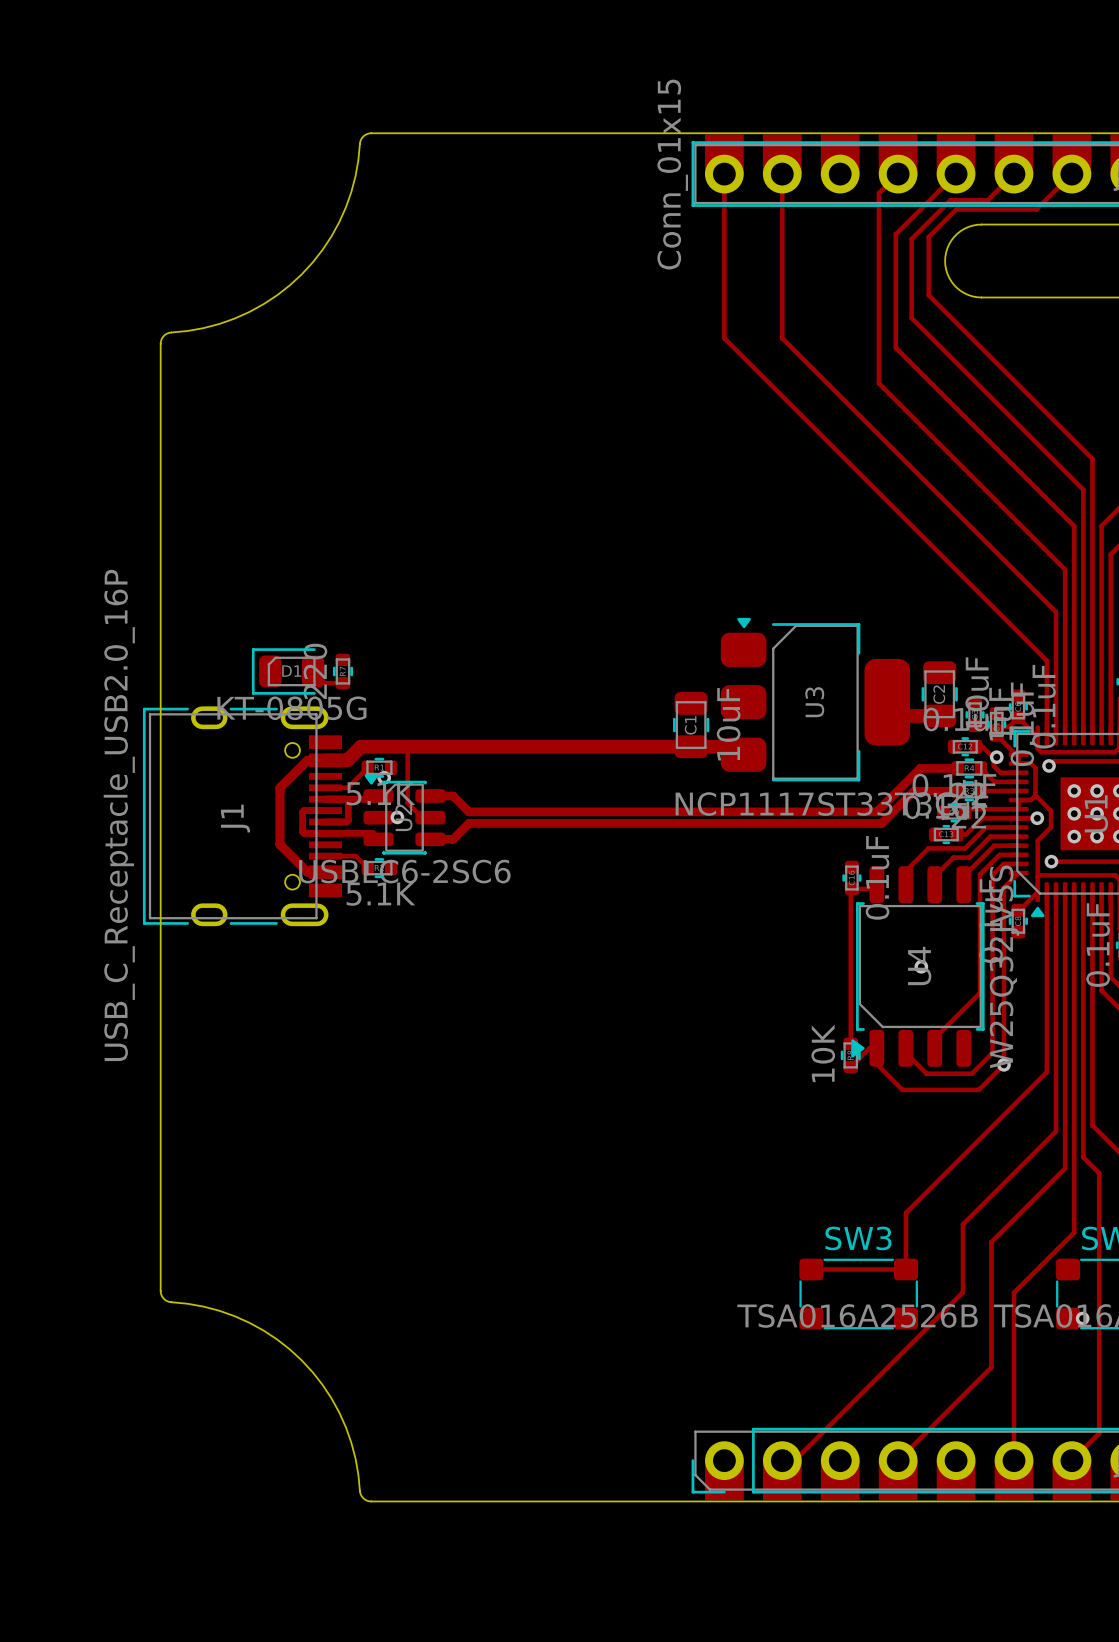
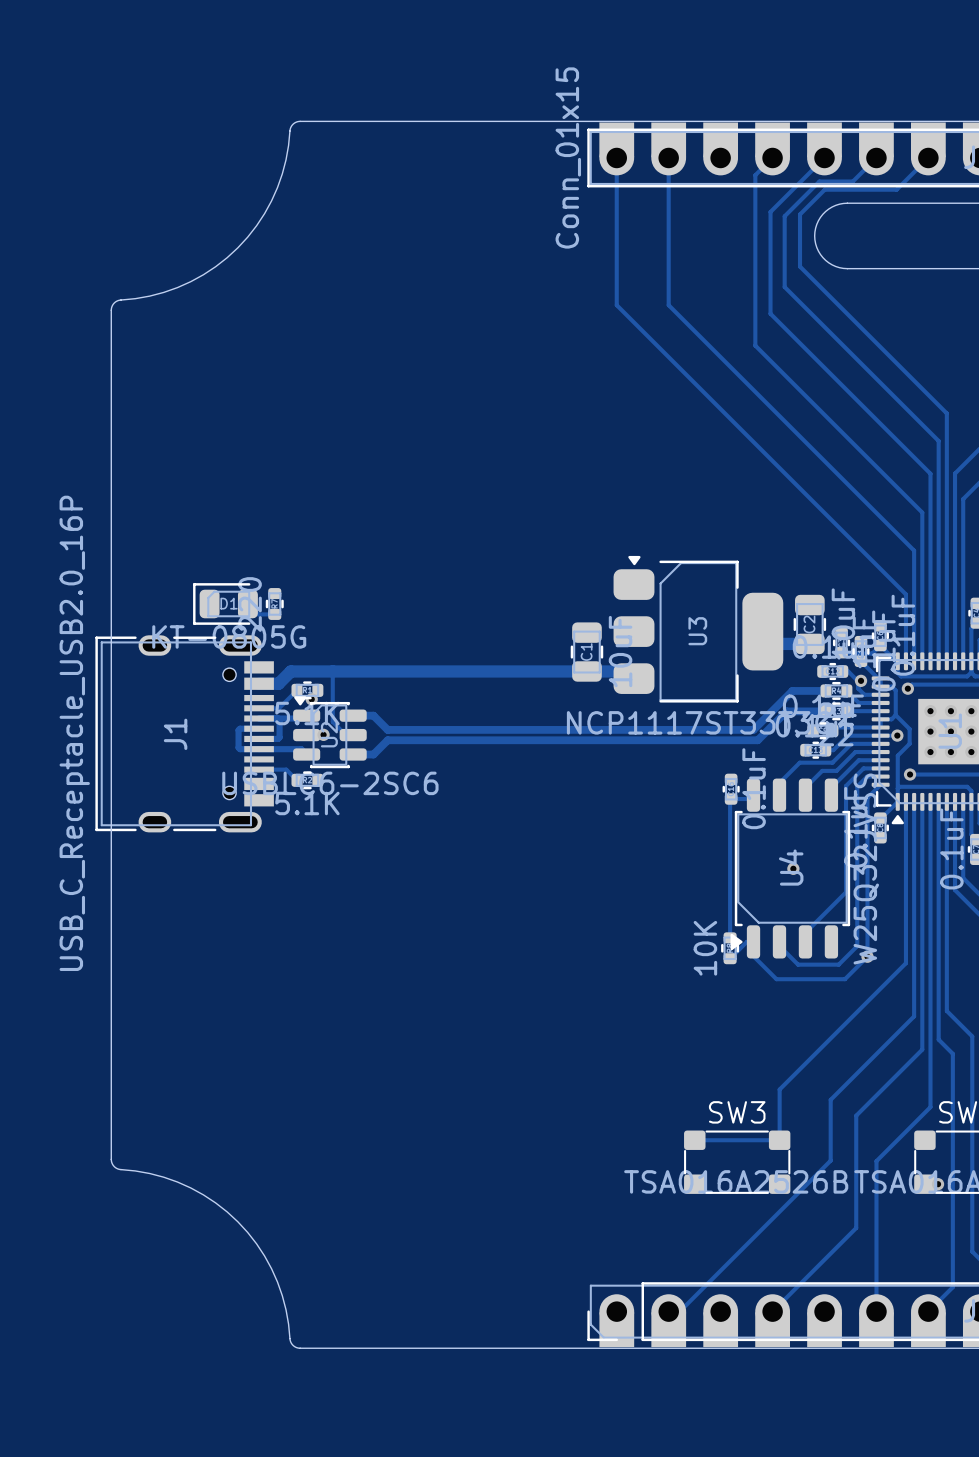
track: (325, 760) (307, 760) (279, 787) (279, 844) (307, 872) (325, 872) -> none

